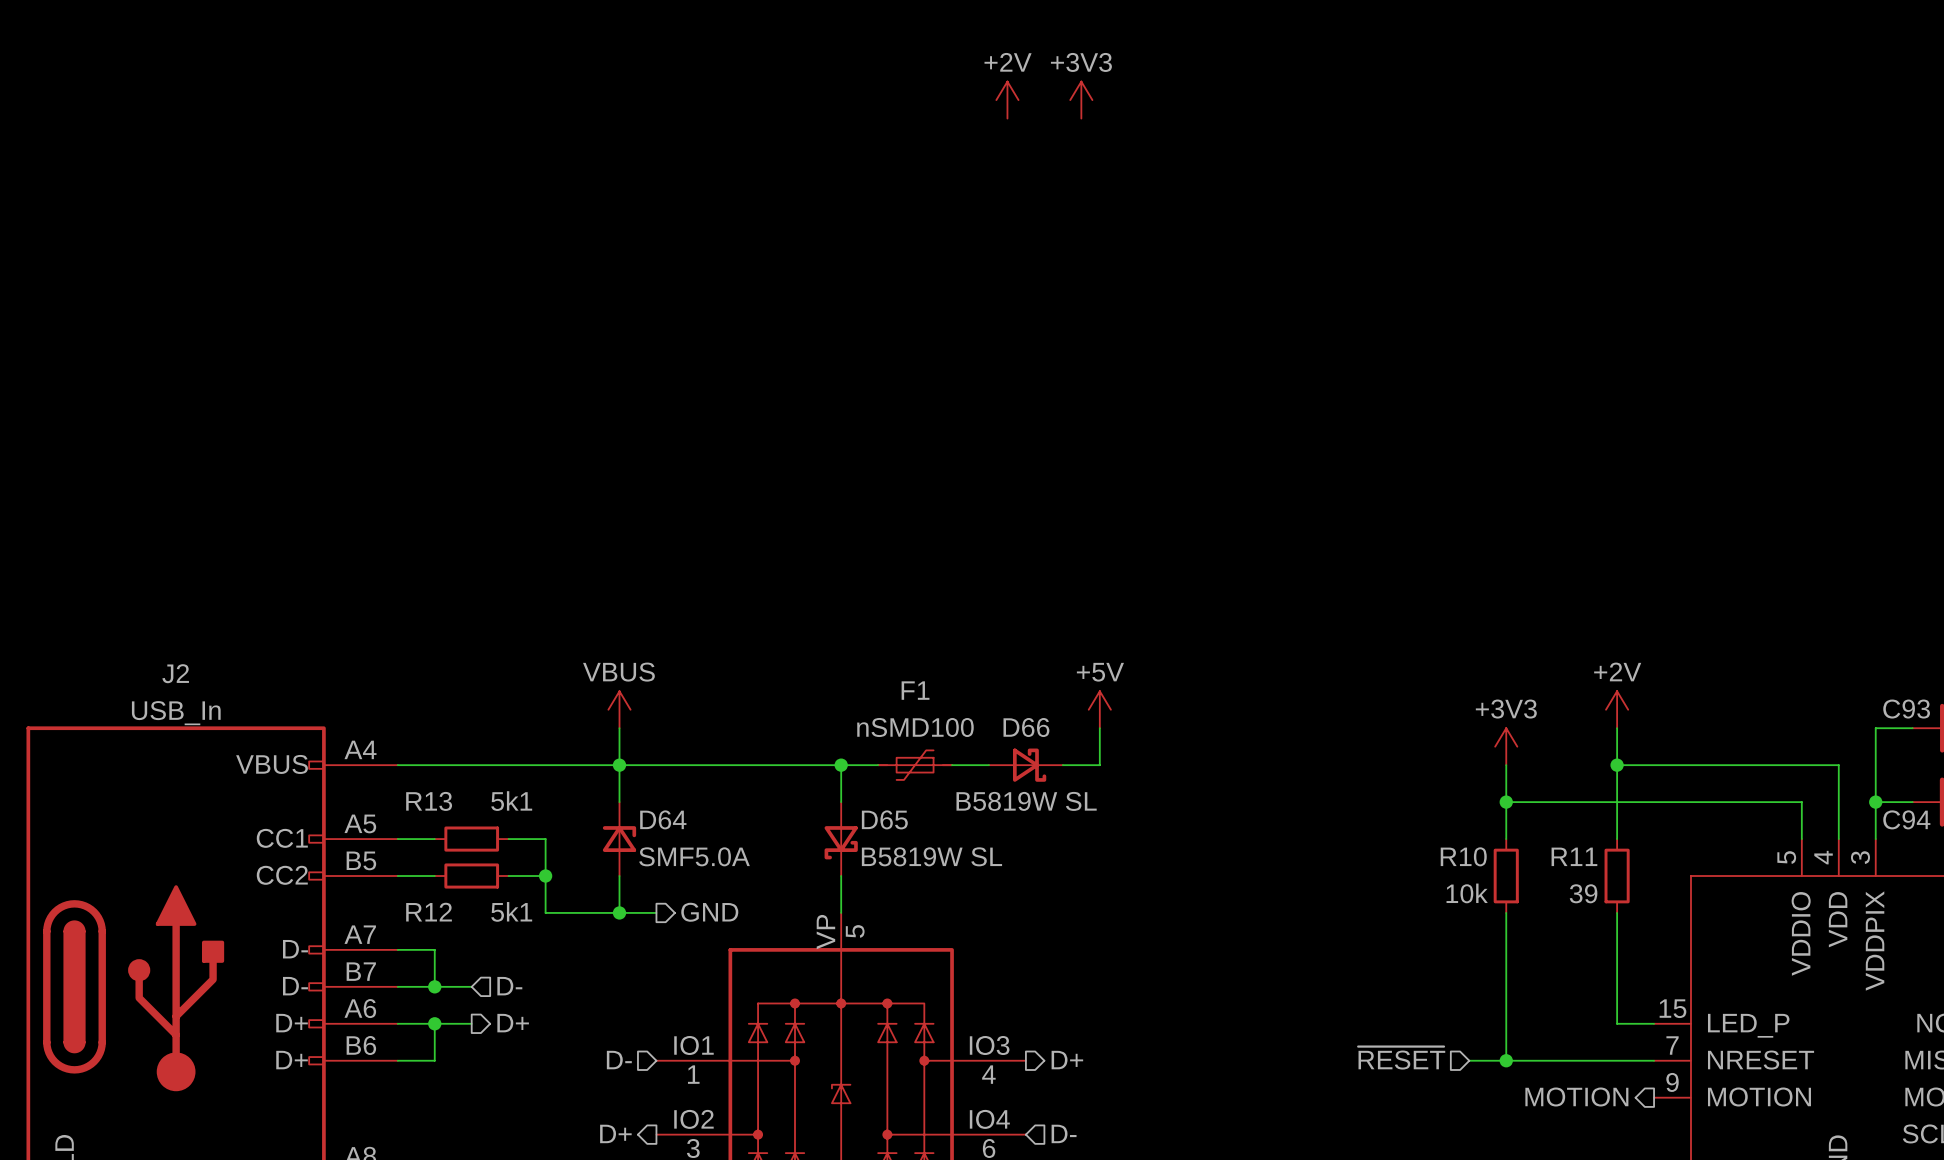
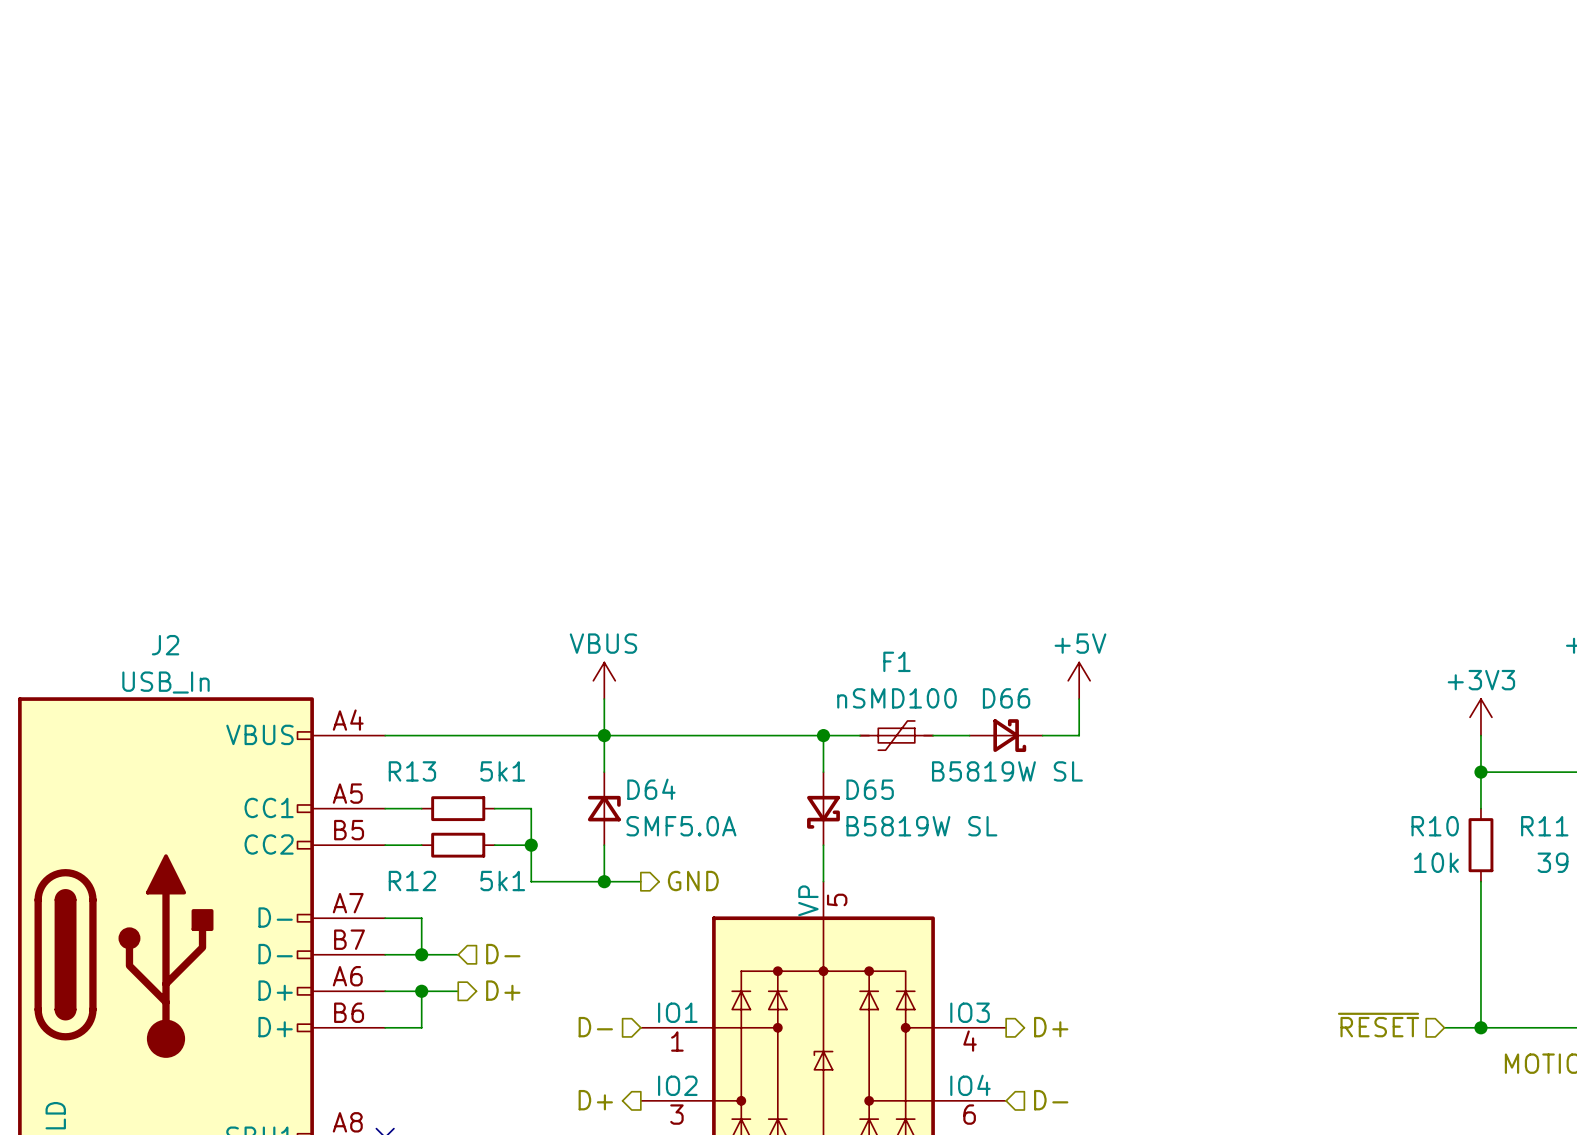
power symbol: +2V (1007, 100) -> none
power symbol: +3V3 (1081, 100) -> none

